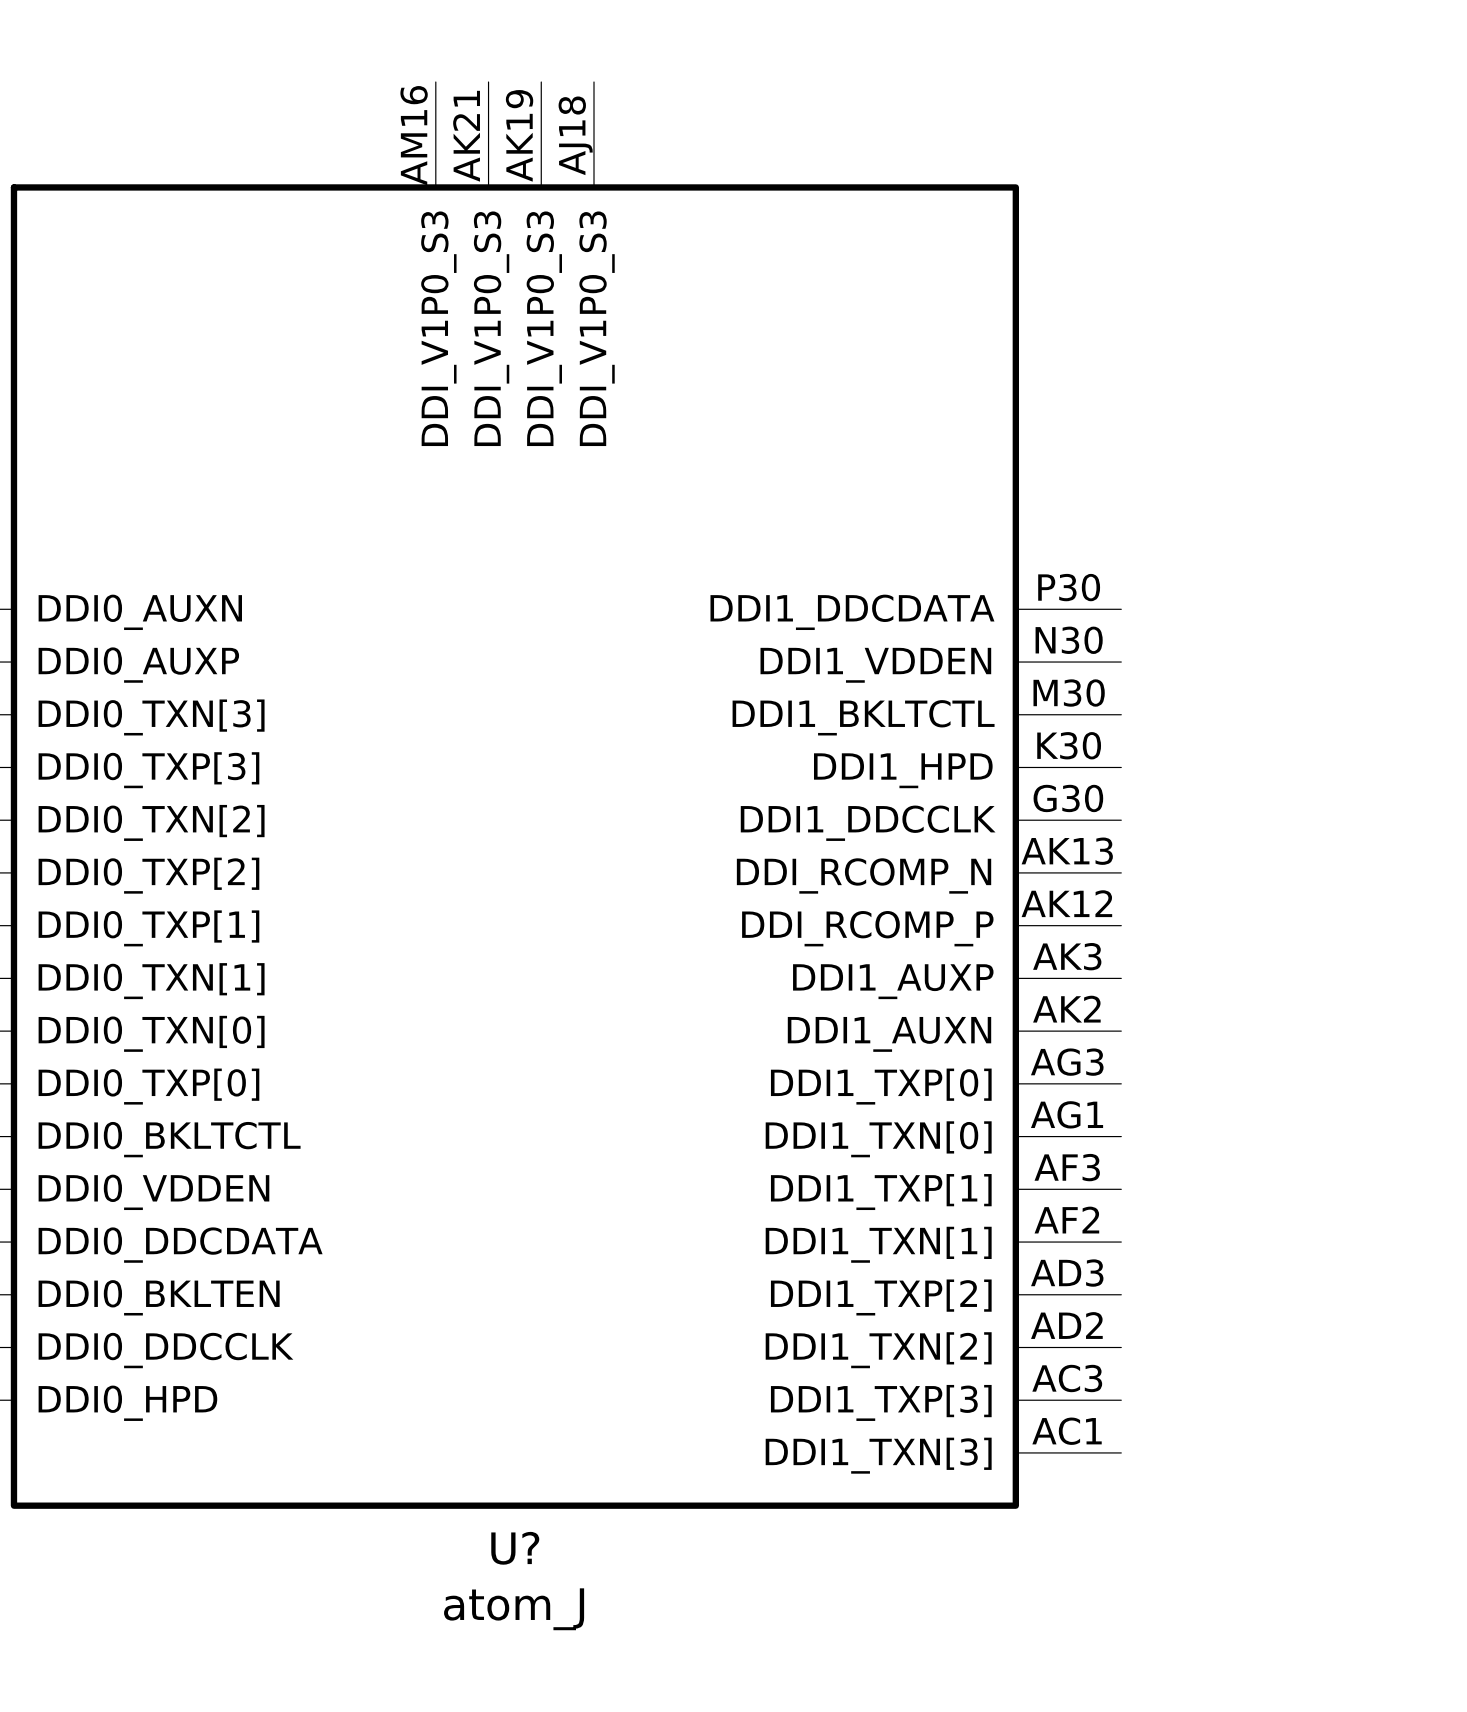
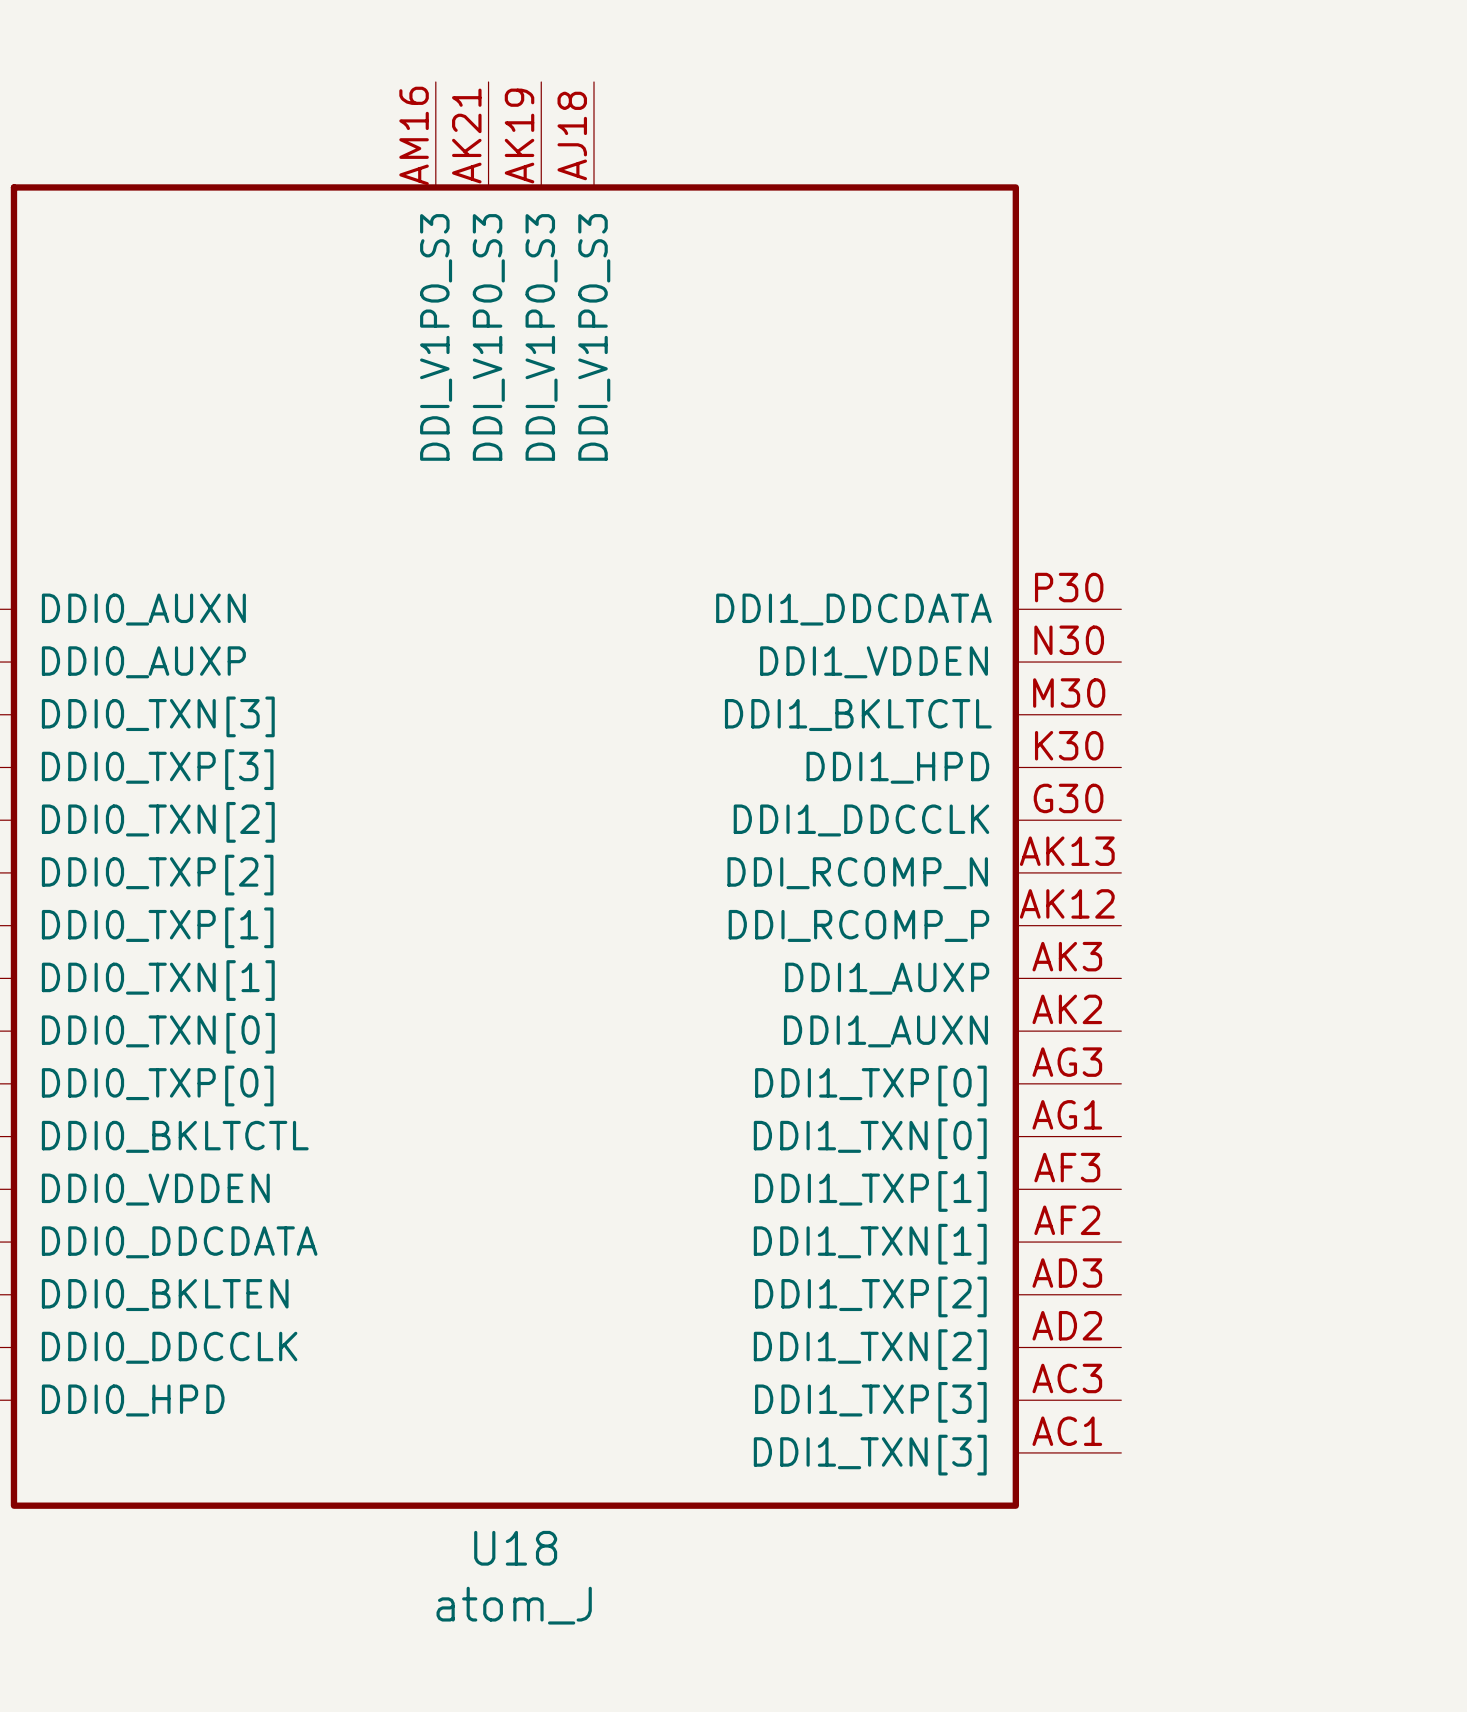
U? name: U? (515, 1548) -> U18 (515, 1548)

